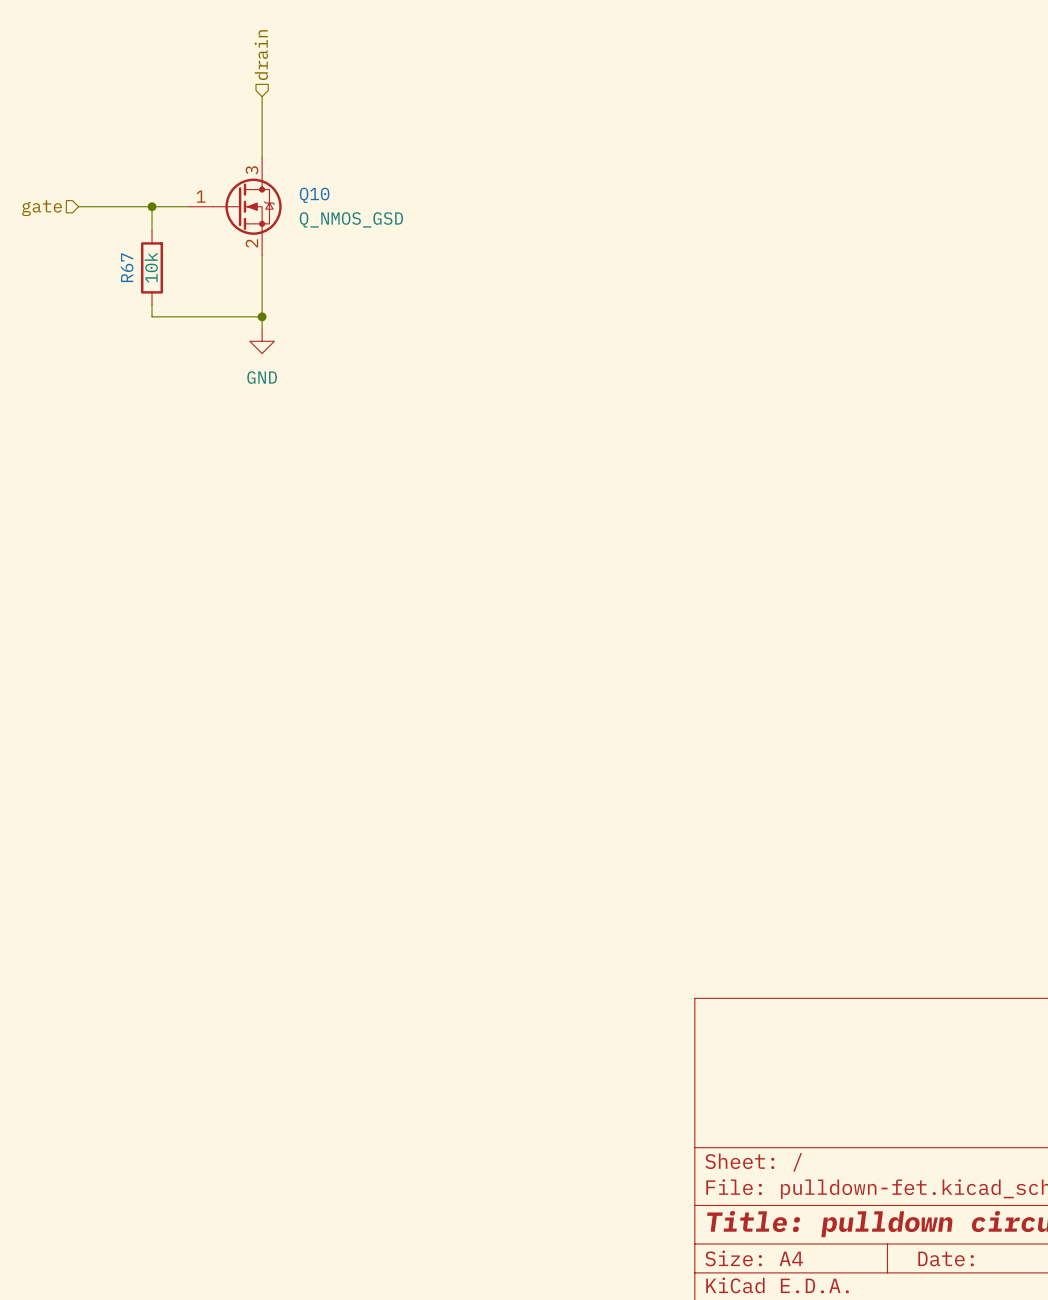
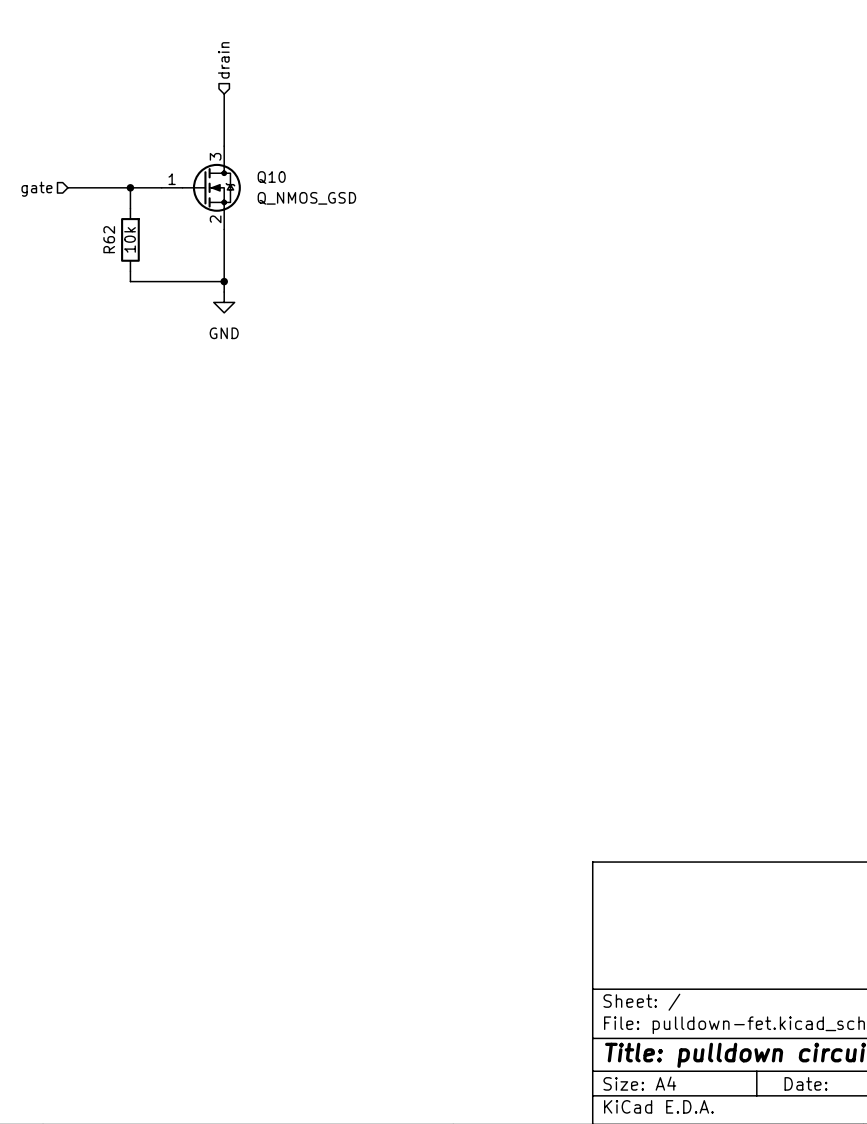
R67 name: R67 (127, 267) -> R62 (109, 239)

